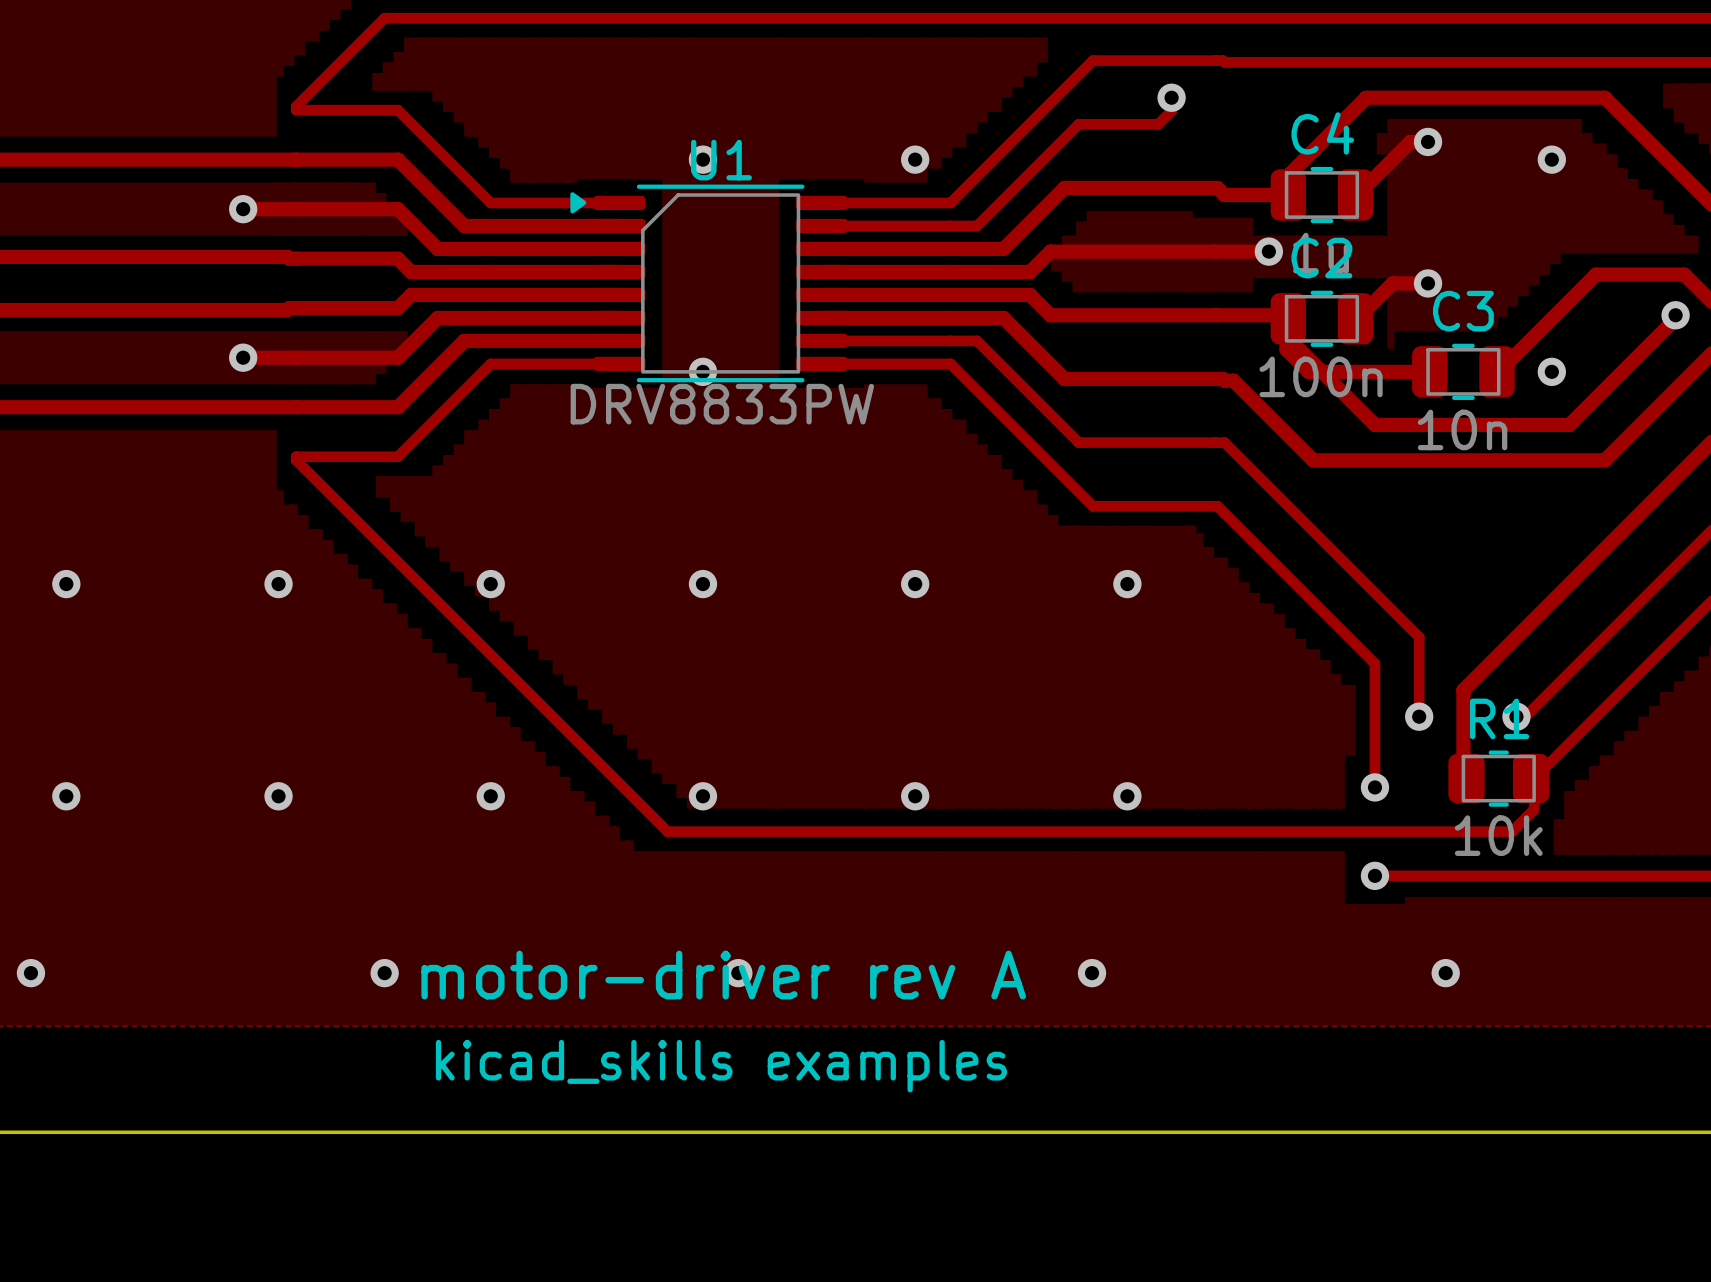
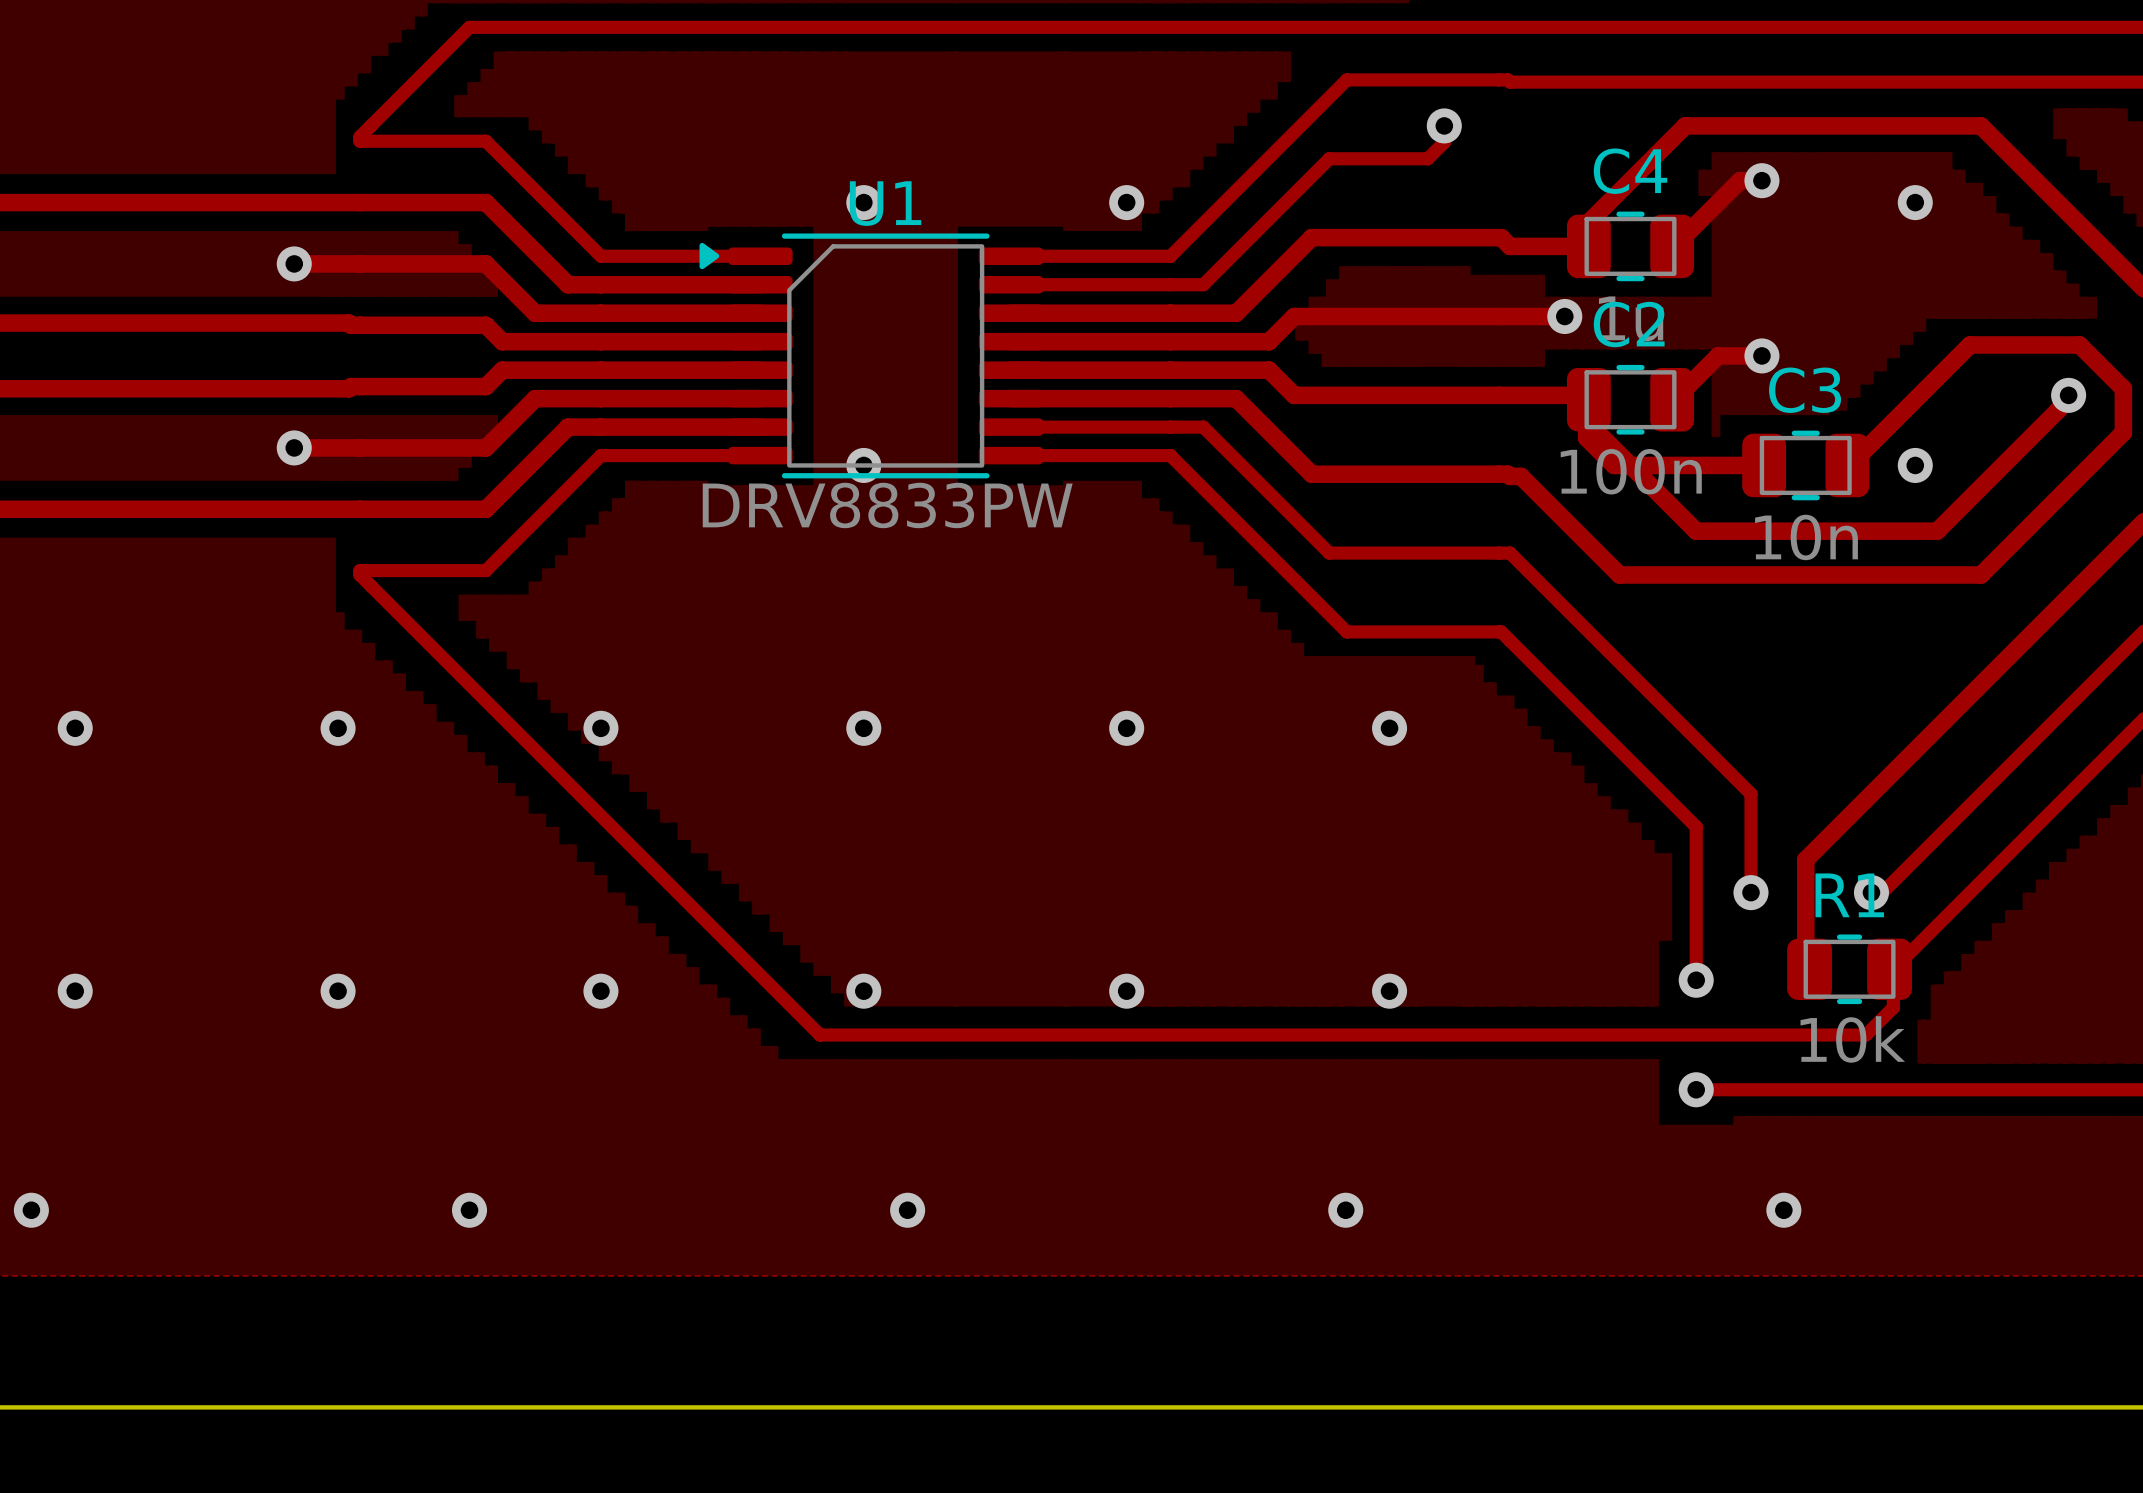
text: motor-driver rev A (723, 975) -> none
text: kicad_skills examples (721, 1066) -> none

